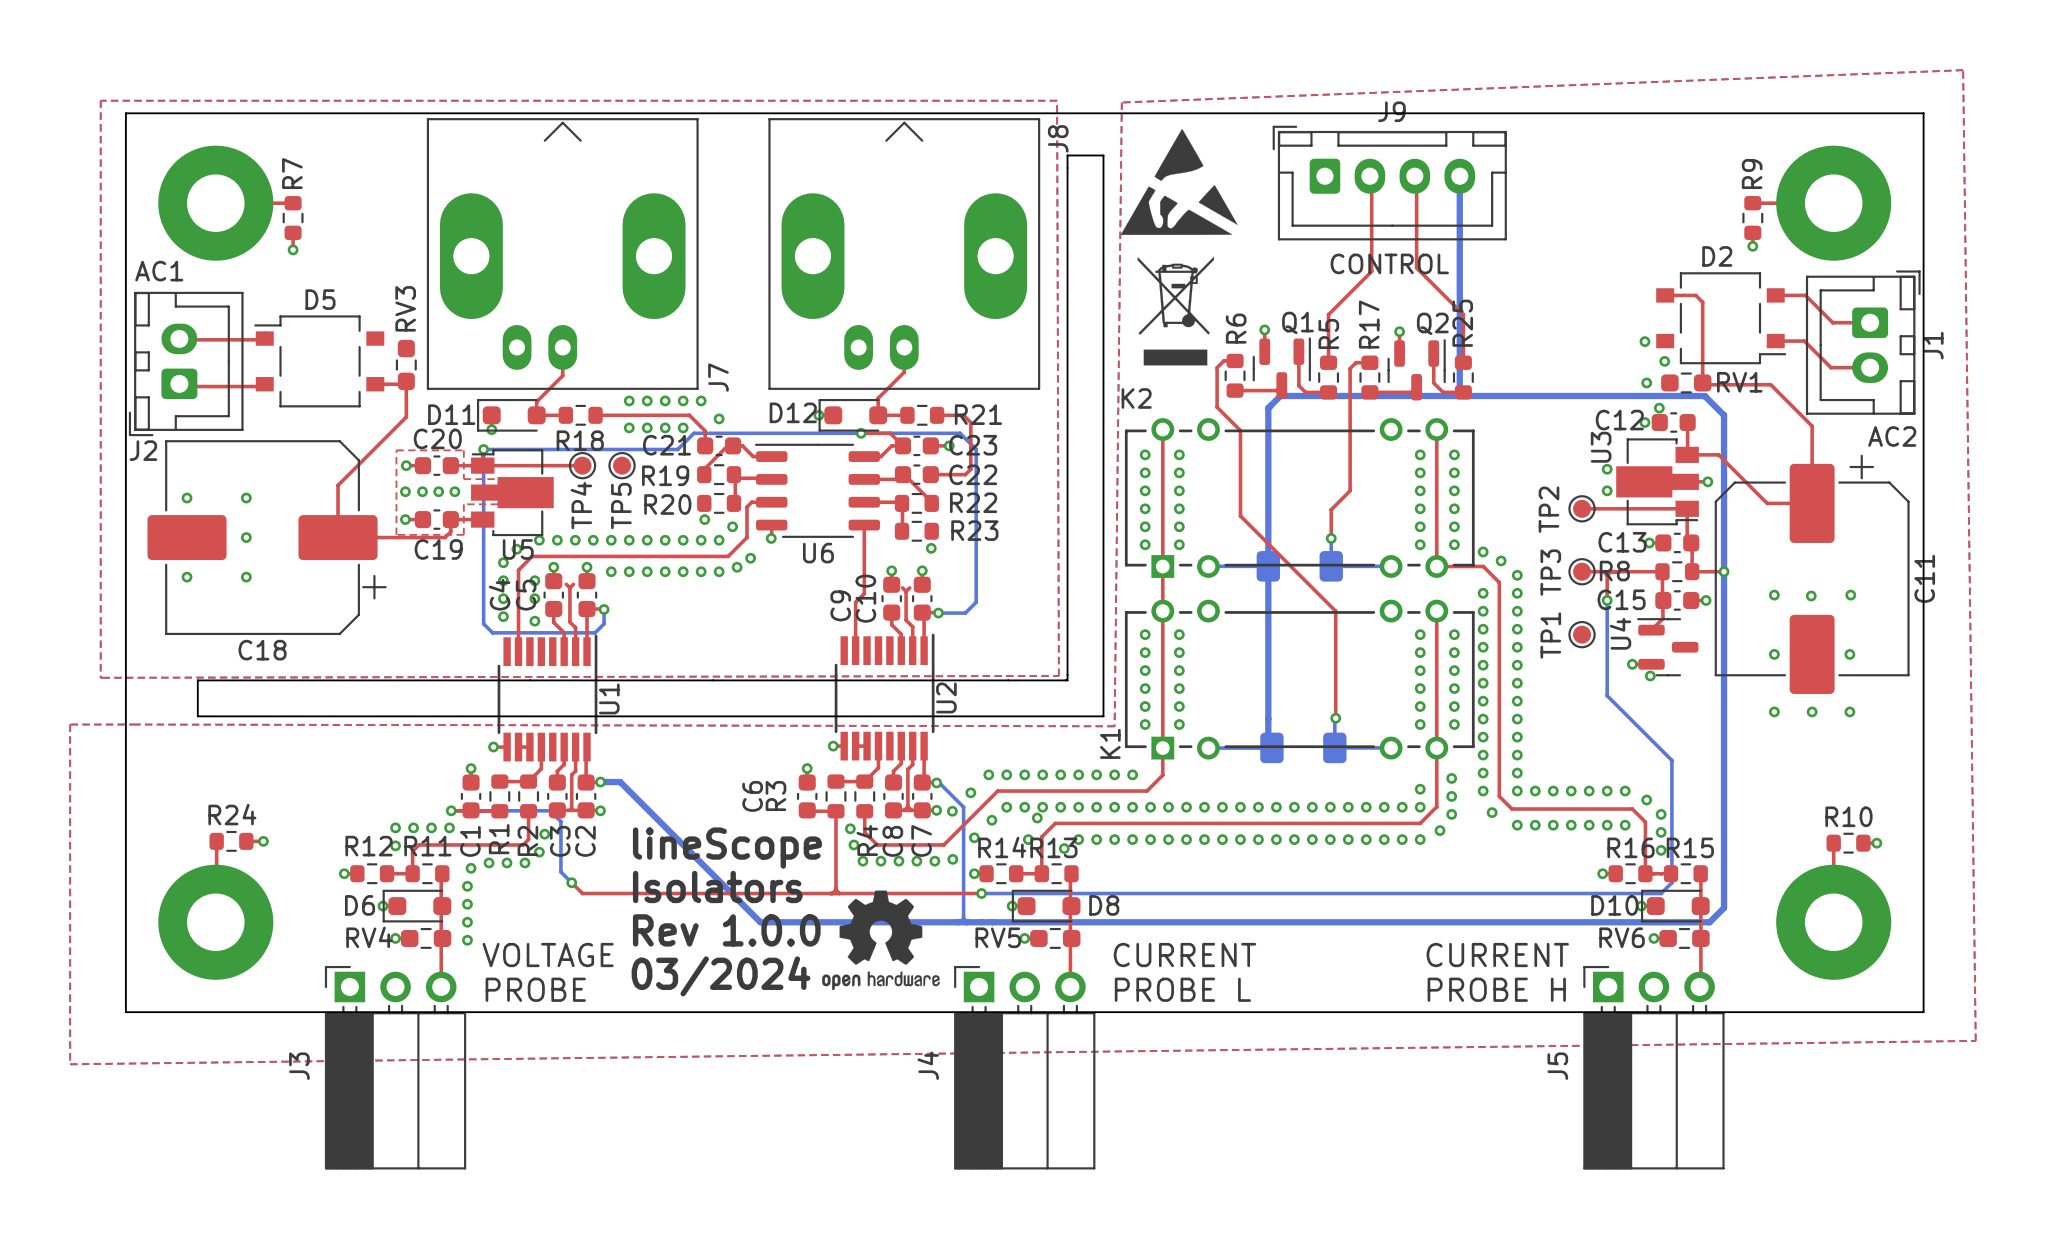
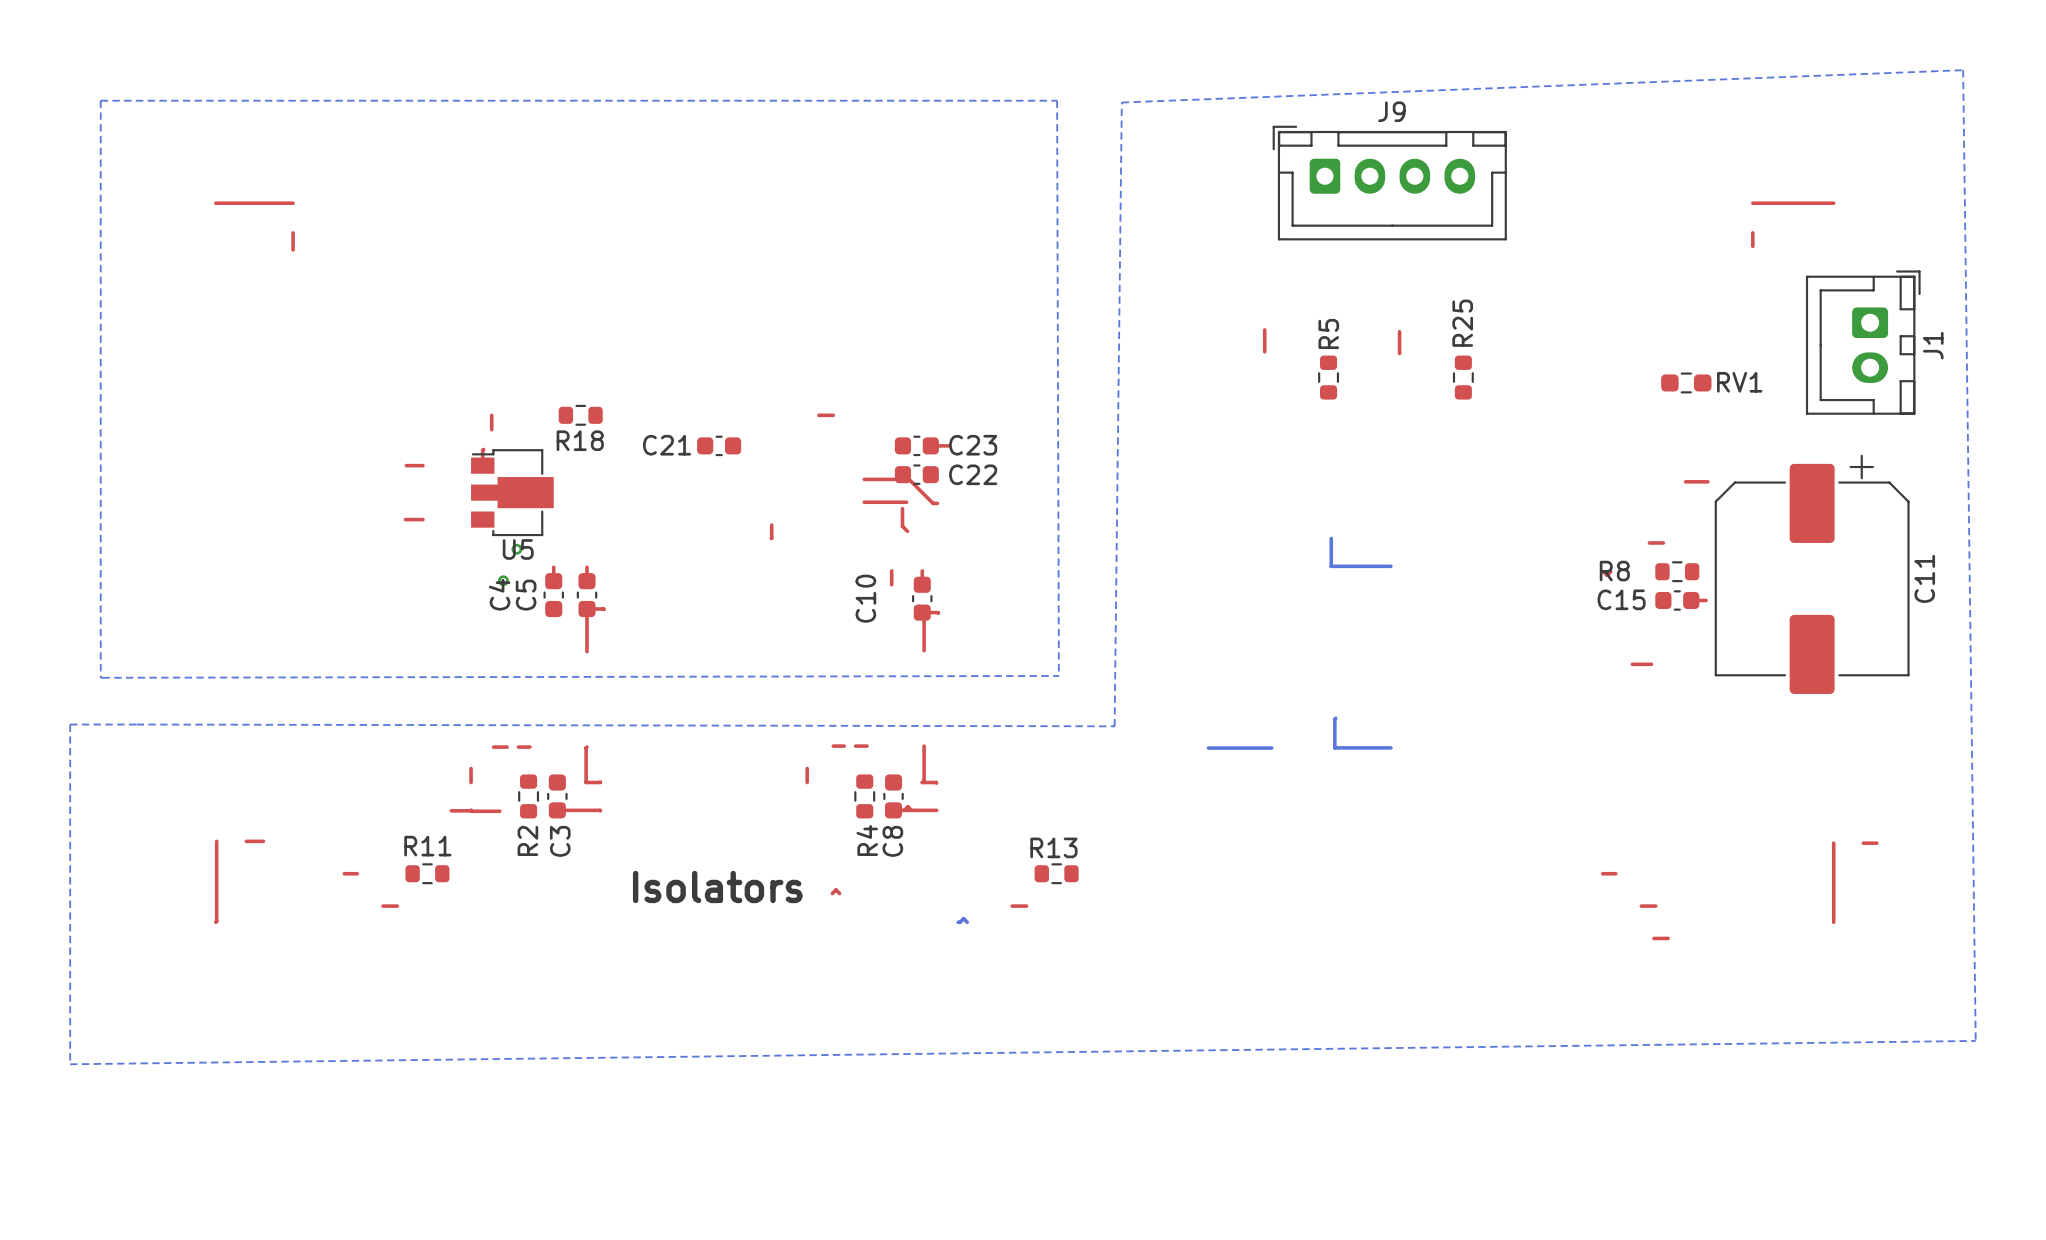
top zone outline: (1963, 70) (1975, 1040) (70, 1064) (70, 724) (1114, 726) (1121, 102) (1963, 70) -> none
top zone outline: (100, 100) (1057, 100) (1058, 675) (100, 677) (100, 100) -> none
board edge: (125, 113) (1923, 113) (1923, 1012) (125, 1012) (125, 113) -> none
drawing: [1120, 128, 1238, 235] -> none
board edge: (1067, 155) (1067, 680) (197, 680) (197, 716) (1103, 716) (1103, 155) (1067, 155) -> none
bottom track: (1459, 176) (1459, 390) -> none
top track: (1371, 188) (1371, 271) (1328, 314) (1328, 362) -> none
top track: (1416, 188) (1416, 267) (1463, 314) (1463, 362) -> none
part: (215, 203) -> none
part: (1833, 203) -> none
R7: (293, 218) -> none
R9: (1752, 218) -> none
via: (1752, 246) -> none
via: (293, 249) -> none
J7: (562, 253) -> none
J8: (904, 253) -> none
drawing: [1137, 256, 1215, 366] -> none
text: CONTROL (1389, 263) -> none
text: AC1 (159, 271) -> none
top track: (1665, 295) (1695, 295) (1702, 302) (1702, 384) (1770, 384) (1812, 426) (1812, 503) (1767, 503) (1718, 454) (1687, 454) (1687, 422) -> none
top track: (1775, 295) (1805, 295) (1832, 322) (1870, 322) -> none
D2: (1721, 318) -> none
via: (1264, 329) -> none
top track: (179, 331) (187, 339) (258, 339) (264, 333) -> none
via: (1399, 331) -> none
via: (1644, 341) -> none
top track: (1775, 341) (1804, 341) (1831, 367) (1870, 367) -> none
top track: (562, 347) (562, 375) (536, 401) (536, 415) (565, 415) (562, 412) -> none
top track: (904, 347) (904, 372) (878, 398) (878, 415) (907, 415) -> none
top track: (1298, 351) (1298, 385) (1305, 392) (1328, 392) -> none
top track: (1433, 353) (1433, 382) (1443, 392) (1463, 392) -> none
top track: (1235, 360) (1223, 360) (1217, 367) (1217, 407) (1240, 430) (1240, 515) (1335, 611) (1335, 718) -> none
D5: (319, 361) -> none
via: (1664, 361) -> none
top track: (1369, 362) (1355, 362) (1350, 368) (1350, 490) (1331, 509) (1331, 538) -> none
J2: (186, 364) -> none
RV3: (406, 364) -> none
Q1: (1281, 368) -> none
Q2: (1416, 369) -> none
R6: (1235, 375) -> none
top track: (179, 376) (189, 386) (257, 386) (264, 378) -> none
R17: (1369, 377) -> none
via: (1646, 382) -> none
top track: (375, 384) (403, 384) (406, 381) (406, 417) (338, 485) (338, 537) (444, 537) (450, 531) (450, 519) (482, 519) -> none
top track: (1281, 385) (1276, 390) (1235, 390) -> none
top track: (1416, 387) (1411, 392) (1369, 392) -> none
via: (629, 400) -> none
via: (647, 400) -> none
via: (665, 400) -> none
via: (683, 400) -> none
via: (701, 400) -> none
via: (1659, 408) -> none
D11: (511, 415) -> none
top track: (595, 415) (689, 415) (705, 431) (705, 445) -> none
via: (818, 415) -> none
D12: (852, 415) -> none
R21: (922, 415) -> none
top track: (937, 415) (963, 415) (970, 422) (970, 469) (965, 474) (936, 474) -> none
via: (719, 418) -> none
via: (1644, 422) -> none
C12: (1673, 422) -> none
via: (629, 427) -> none
via: (647, 427) -> none
via: (665, 427) -> none
via: (683, 427) -> none
via: (491, 429) -> none
top track: (1162, 429) (1162, 775) (1146, 791) (997, 791) (943, 844) (877, 844) (864, 832) (864, 811) -> none
top track: (1436, 429) (1436, 566) (1483, 566) (1499, 582) (1499, 796) (1511, 809) (1632, 809) (1645, 822) (1645, 873) (1671, 873) -> none
top track: (861, 433) (890, 433) (902, 445) (891, 445) (881, 456) (864, 456) -> none
via: (861, 433) -> none
text: AC2 (1892, 436) -> none
via: (949, 445) -> none
via: (483, 449) -> none
top zone outline: (396, 450) (463, 450) (463, 479) (498, 479) (498, 504) (463, 504) (463, 534) (396, 534) (396, 450) -> none
via: (1145, 454) -> none
via: (1179, 454) -> none
via: (1420, 454) -> none
via: (1454, 454) -> none
top track: (771, 456) (753, 456) (742, 445) (727, 445) (698, 474) -> none
via: (406, 465) -> none
C20: (436, 465) -> none
top track: (450, 465) (582, 465) -> none
TP4: (582, 465) -> none
TP5: (622, 465) -> none
via: (1607, 469) -> none
via: (1145, 472) -> none
via: (1179, 472) -> none
via: (1420, 472) -> none
via: (1454, 472) -> none
R19: (719, 474) -> none
top track: (771, 479) (738, 478) (735, 481) (735, 496) -> none
U3: (1657, 481) -> none
via: (1707, 481) -> none
U6: (817, 490) -> none
via: (1145, 490) -> none
via: (1179, 490) -> none
via: (1420, 490) -> none
via: (1454, 490) -> none
via: (1607, 490) -> none
via: (405, 491) -> none
via: (422, 491) -> none
via: (438, 491) -> none
via: (454, 491) -> none
via: (187, 498) -> none
via: (246, 498) -> none
K2: (1299, 498) -> none
top track: (771, 502) (751, 502) (747, 507) (747, 537) (728, 556) (532, 556) (518, 570) (518, 651) -> none
R20: (719, 503) -> none
R22: (916, 503) -> none
via: (1145, 508) -> none
via: (1179, 508) -> none
via: (1420, 508) -> none
via: (1454, 508) -> none
top track: (1582, 508) (1687, 508) (1687, 538) (1692, 543) (1692, 571) (1724, 571) -> none
TP2: (1582, 508) -> none
via: (405, 519) -> none
C19: (436, 519) -> none
via: (704, 519) -> none
top track: (864, 525) (864, 593) (855, 602) (855, 650) -> none
via: (732, 526) -> none
via: (1145, 526) -> none
via: (1179, 526) -> none
via: (1420, 526) -> none
via: (1454, 526) -> none
R23: (916, 531) -> none
via: (246, 537) -> none
C18: (267, 537) -> none
via: (771, 538) -> none
via: (1331, 538) -> none
via: (539, 540) -> none
via: (557, 540) -> none
via: (575, 540) -> none
via: (593, 540) -> none
via: (611, 540) -> none
via: (629, 540) -> none
via: (647, 540) -> none
via: (665, 540) -> none
via: (683, 540) -> none
via: (701, 540) -> none
via: (719, 540) -> none
via: (1649, 542) -> none
C13: (1677, 542) -> none
via: (1145, 544) -> none
via: (1179, 544) -> none
via: (1420, 544) -> none
via: (1454, 544) -> none
via: (931, 548) -> none
via: (1483, 551) -> none
via: (750, 558) -> none
via: (1501, 560) -> none
via: (503, 562) -> none
bottom track: (1208, 566) (1268, 566) -> none
part: (1299, 566) -> none
via: (553, 567) -> none
via: (587, 567) -> none
via: (737, 567) -> none
via: (891, 570) -> none
via: (922, 570) -> none
via: (611, 571) -> none
via: (629, 571) -> none
via: (647, 571) -> none
via: (665, 571) -> none
via: (683, 571) -> none
via: (701, 571) -> none
via: (719, 571) -> none
top track: (1582, 571) (1662, 571) (1662, 618) (1651, 630) -> none
TP3: (1582, 571) -> none
via: (1724, 571) -> none
via: (1517, 575) -> none
top track: (1607, 575) (1607, 600) -> none
via: (187, 577) -> none
via: (246, 577) -> none
via: (534, 580) -> none
top track: (566, 584) (569, 587) -> none
top track: (573, 584) (569, 587) -> none
top track: (569, 587) (569, 622) (575, 627) (575, 651) -> none
top track: (902, 587) (906, 591) -> none
top track: (909, 587) (906, 591) -> none
top track: (906, 591) (906, 620) (912, 626) (912, 650) -> none
via: (1483, 593) -> none
via: (1517, 593) -> none
via: (1774, 595) -> none
via: (1811, 595) -> none
via: (1850, 595) -> none
via: (503, 598) -> none
via: (534, 598) -> none
C9: (891, 598) -> none
bottom track: (1607, 600) (1607, 695) (1671, 760) (1671, 882) (1661, 893) (981, 893) -> none
via: (1607, 600) -> none
via: (1706, 600) -> none
top track: (553, 609) (553, 622) (564, 632) (564, 651) -> none
bottom track: (604, 609) (604, 623) (595, 632) (492, 632) (483, 623) (483, 449) (677, 449) (693, 433) (960, 433) (976, 449) (976, 602) (965, 613) (938, 613) -> none
via: (604, 609) -> none
top track: (1436, 611) (1436, 806) (1420, 823) (1055, 823) (1041, 836) (1041, 873) (1016, 873) -> none
via: (1483, 611) -> none
via: (1517, 611) -> none
top track: (891, 612) (891, 624) (901, 634) (901, 650) -> none
via: (938, 613) -> none
via: (503, 616) -> none
via: (534, 621) -> none
via: (1483, 629) -> none
via: (1517, 629) -> none
via: (1145, 634) -> none
via: (1179, 634) -> none
via: (1420, 634) -> none
via: (1454, 634) -> none
TP1: (1582, 634) -> none
via: (1483, 647) -> none
via: (1517, 647) -> none
U4: (1667, 647) -> none
via: (1145, 652) -> none
via: (1179, 652) -> none
via: (1420, 652) -> none
via: (1454, 652) -> none
via: (1774, 654) -> none
via: (1849, 654) -> none
via: (1632, 664) -> none
via: (1483, 665) -> none
via: (1517, 665) -> none
via: (1145, 670) -> none
via: (1179, 670) -> none
via: (1420, 670) -> none
via: (1454, 670) -> none
via: (1650, 675) -> none
K1: (1299, 679) -> none
via: (1483, 683) -> none
via: (1517, 683) -> none
via: (1145, 688) -> none
via: (1179, 688) -> none
via: (1420, 688) -> none
via: (1454, 688) -> none
U2: (884, 697) -> none
U1: (547, 698) -> none
via: (1483, 701) -> none
via: (1517, 701) -> none
via: (1145, 706) -> none
via: (1179, 706) -> none
via: (1420, 706) -> none
via: (1454, 706) -> none
via: (1774, 711) -> none
via: (1812, 711) -> none
via: (1849, 711) -> none
via: (1335, 718) -> none
via: (1483, 719) -> none
via: (1517, 719) -> none
via: (1145, 724) -> none
via: (1179, 724) -> none
via: (1420, 724) -> none
via: (1454, 724) -> none
via: (1483, 737) -> none
via: (1517, 737) -> none
bottom track: (1268, 744) (1268, 408) (1280, 396) (1704, 396) (1724, 415) (1724, 907) (1709, 922) (760, 922) (620, 782) -> none
via: (833, 746) -> none
top track: (878, 746) (878, 767) (864, 781) (835, 781) -> none
top track: (901, 746) (901, 763) (893, 771) (893, 782) -> none
top track: (912, 746) (912, 764) (907, 769) (907, 806) -> none
via: (493, 747) -> none
top track: (541, 747) (541, 768) (528, 781) (499, 781) -> none
top track: (564, 747) (564, 764) (557, 771) (557, 782) -> none
top track: (575, 747) (575, 771) (571, 774) (571, 808) (569, 810) -> none
part: (1303, 747) -> none
via: (1483, 755) -> none
via: (1517, 755) -> none
via: (471, 768) -> none
via: (807, 768) -> none
via: (1483, 773) -> none
via: (1517, 773) -> none
via: (988, 774) -> none
via: (1006, 774) -> none
via: (1024, 774) -> none
via: (1042, 774) -> none
via: (1060, 774) -> none
via: (1078, 774) -> none
via: (1096, 774) -> none
via: (1114, 774) -> none
via: (1132, 774) -> none
via: (1451, 778) -> none
bottom track: (600, 782) (620, 782) -> none
via: (600, 782) -> none
bottom track: (936, 782) (939, 782) (963, 807) (963, 918) -> none
via: (936, 782) -> none
via: (1420, 789) -> none
via: (1483, 791) -> none
via: (1517, 791) -> none
via: (1535, 791) -> none
via: (1553, 791) -> none
via: (1571, 791) -> none
via: (1589, 791) -> none
via: (1607, 791) -> none
via: (1625, 791) -> none
via: (970, 792) -> none
C1: (471, 796) -> none
R1: (499, 796) -> none
C2: (586, 796) -> none
C6: (807, 796) -> none
R3: (835, 796) -> none
C7: (922, 796) -> none
via: (1451, 796) -> none
via: (1646, 800) -> none
via: (1006, 807) -> none
via: (1024, 807) -> none
via: (1042, 807) -> none
via: (1060, 807) -> none
via: (1078, 807) -> none
via: (1096, 807) -> none
via: (1114, 807) -> none
via: (1132, 807) -> none
via: (1150, 807) -> none
via: (1168, 807) -> none
via: (1186, 807) -> none
via: (1204, 807) -> none
via: (1222, 807) -> none
via: (1240, 807) -> none
via: (1258, 807) -> none
via: (1276, 807) -> none
via: (1294, 807) -> none
via: (1312, 807) -> none
via: (1330, 807) -> none
via: (1348, 807) -> none
via: (1366, 807) -> none
via: (1384, 807) -> none
via: (1402, 807) -> none
via: (1420, 807) -> none
bottom track: (451, 810) (550, 810) (560, 821) (560, 871) (571, 882) -> none
via: (451, 810) -> none
via: (600, 810) -> none
top track: (807, 810) (835, 811) (835, 891) -> none
via: (936, 810) -> none
top track: (528, 811) (528, 839) (523, 844) (418, 844) (412, 851) (412, 873) (387, 873) -> none
via: (952, 811) -> none
via: (1492, 812) -> none
via: (1451, 814) -> none
via: (1661, 814) -> none
via: (1037, 818) -> none
via: (991, 820) -> none
via: (1517, 825) -> none
via: (1535, 825) -> none
via: (1553, 825) -> none
via: (1571, 825) -> none
via: (1589, 825) -> none
via: (1607, 825) -> none
via: (1625, 825) -> none
via: (395, 827) -> none
via: (413, 827) -> none
via: (431, 827) -> none
via: (449, 827) -> none
via: (850, 828) -> none
via: (1440, 830) -> none
via: (1661, 832) -> none
via: (544, 834) -> none
via: (974, 837) -> none
via: (1028, 839) -> none
via: (1078, 839) -> none
via: (1096, 839) -> none
via: (1114, 839) -> none
via: (1132, 839) -> none
via: (1150, 839) -> none
via: (1168, 839) -> none
via: (1186, 839) -> none
via: (1204, 839) -> none
via: (1222, 839) -> none
via: (1240, 839) -> none
via: (1258, 839) -> none
via: (1276, 839) -> none
via: (1294, 839) -> none
via: (1312, 839) -> none
via: (1330, 839) -> none
via: (1348, 839) -> none
via: (1366, 839) -> none
via: (1384, 839) -> none
via: (1402, 839) -> none
via: (1420, 839) -> none
R24: (231, 841) -> none
via: (263, 841) -> none
R10: (1848, 843) -> none
via: (1876, 843) -> none
via: (853, 844) -> none
via: (395, 845) -> none
text: lineScope (727, 848) -> none
via: (1064, 848) -> none
via: (1661, 850) -> none
via: (539, 852) -> none
via: (952, 859) -> none
via: (862, 861) -> none
via: (880, 861) -> none
via: (898, 861) -> none
via: (916, 861) -> none
via: (934, 861) -> none
via: (489, 862) -> none
via: (507, 862) -> none
via: (524, 862) -> none
via: (471, 868) -> none
via: (344, 873) -> none
R12: (372, 873) -> none
top track: (442, 873) (441, 986) -> none
via: (974, 873) -> none
R14: (1001, 873) -> none
top track: (1071, 873) (1070, 986) -> none
via: (1602, 873) -> none
R16: (1630, 873) -> none
R15: (1685, 873) -> none
top track: (1700, 873) (1699, 986) -> none
top track: (571, 882) (582, 893) (981, 893) -> none
via: (571, 882) -> none
via: (467, 886) -> none
drawing: [822, 890, 940, 991] -> none
via: (981, 893) -> none
via: (467, 904) -> none
via: (382, 906) -> none
D6: (416, 906) -> none
via: (1012, 906) -> none
D8: (1046, 906) -> none
via: (1641, 906) -> none
D10: (1675, 906) -> none
part: (215, 922) -> none
via: (467, 922) -> none
part: (1833, 922) -> none
text: Rev 1.0.0 (726, 930) -> none
via: (395, 938) -> none
RV4: (426, 938) -> none
via: (1024, 938) -> none
RV5: (1055, 938) -> none
via: (1653, 938) -> none
RV6: (1684, 938) -> none
via: (467, 940) -> none
text: VOLTAGE (548, 955) -> none
text: CURRENT (1184, 955) -> none
text: CURRENT (1497, 955) -> none
text: 03/2024 (721, 976) -> none
text: PROBE (535, 989) -> none
text: PROBE L (1182, 989) -> none
text: PROBE H (1496, 989) -> none
J3: (395, 1067) -> none
J4: (1024, 1067) -> none
J5: (1653, 1067) -> none

